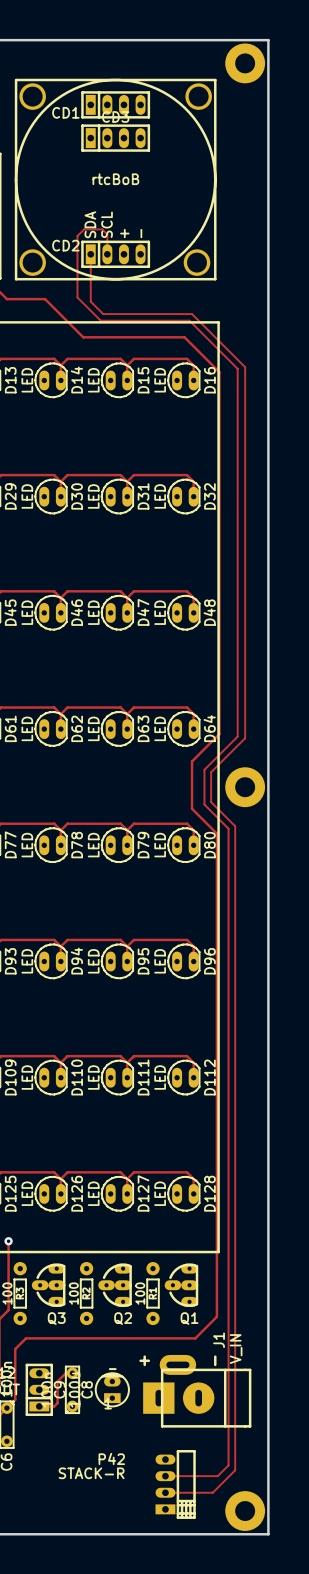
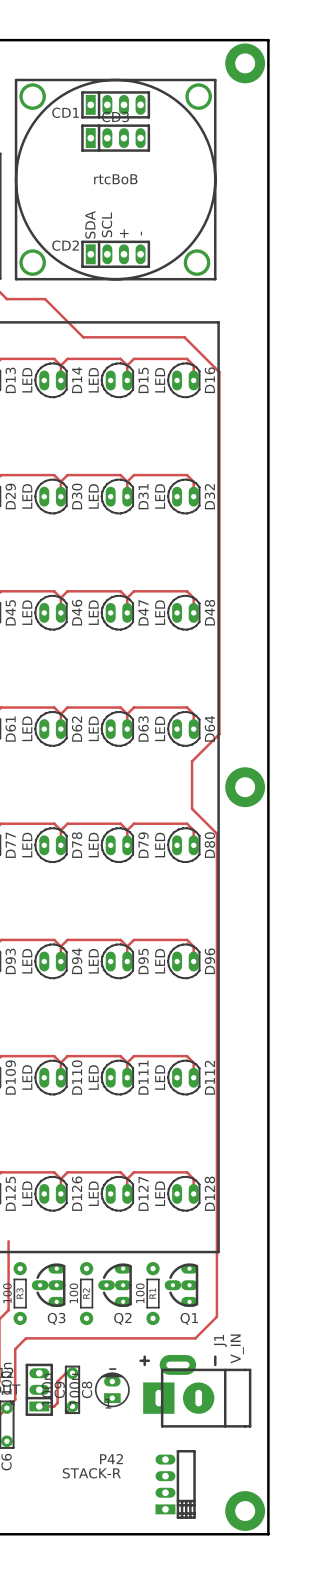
track: (90, 254) (90, 301) (103, 314) (192, 314) (245, 367) (245, 738) (211, 772) (211, 802) (235, 826) (235, 1470) (212, 1492) (165, 1492) -> none
track: (107, 254) (107, 234) (102, 229) (84, 229) (77, 236) (77, 297) (100, 320) (189, 320) (237, 368) (237, 736) (204, 769) (204, 804) (228, 828) (228, 1465) (217, 1476) (165, 1476) -> none
via: (8, 1241) -> none

